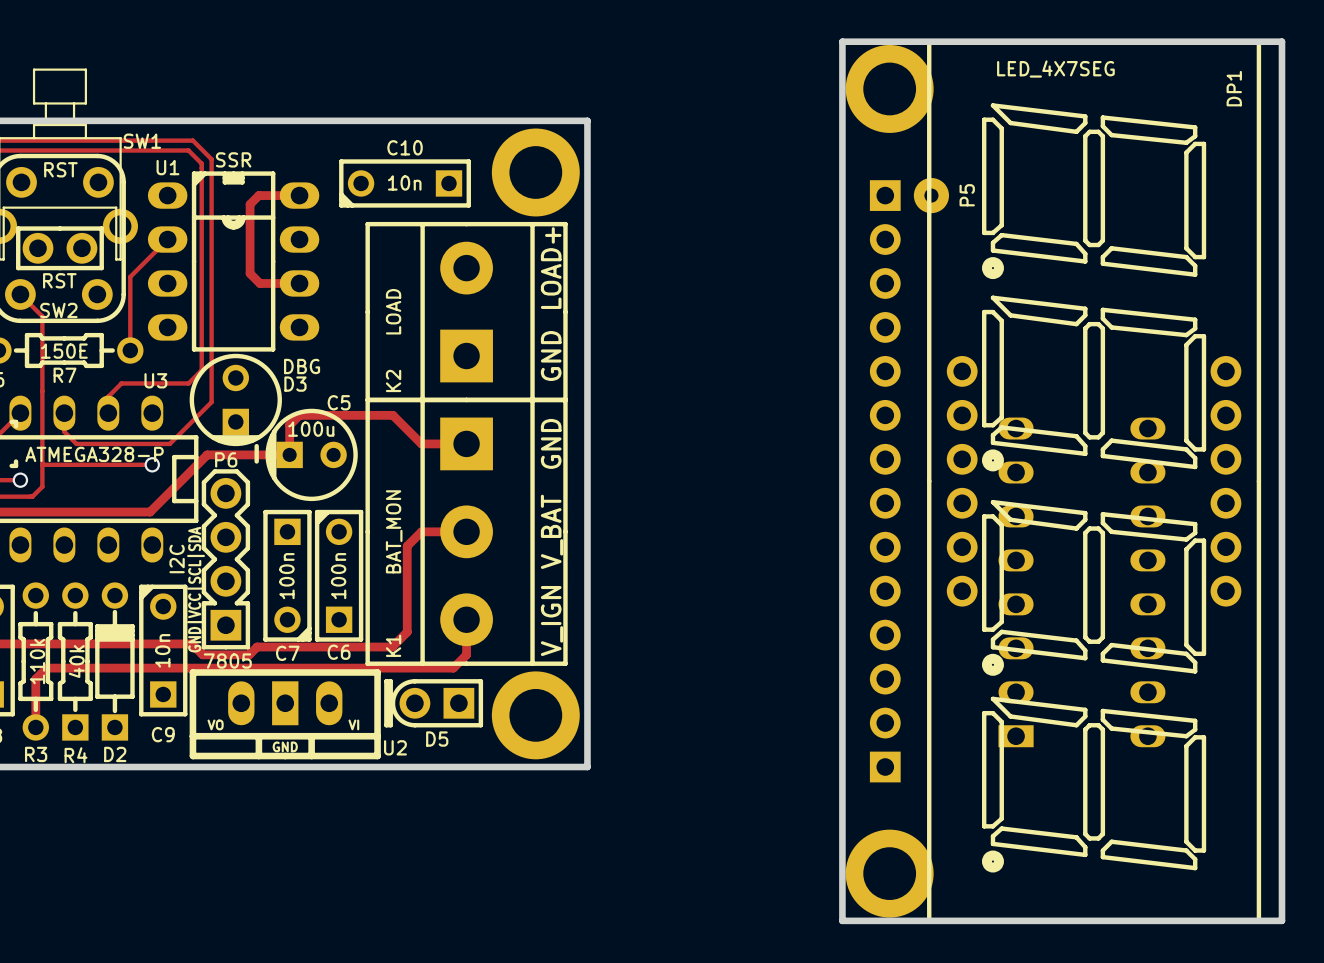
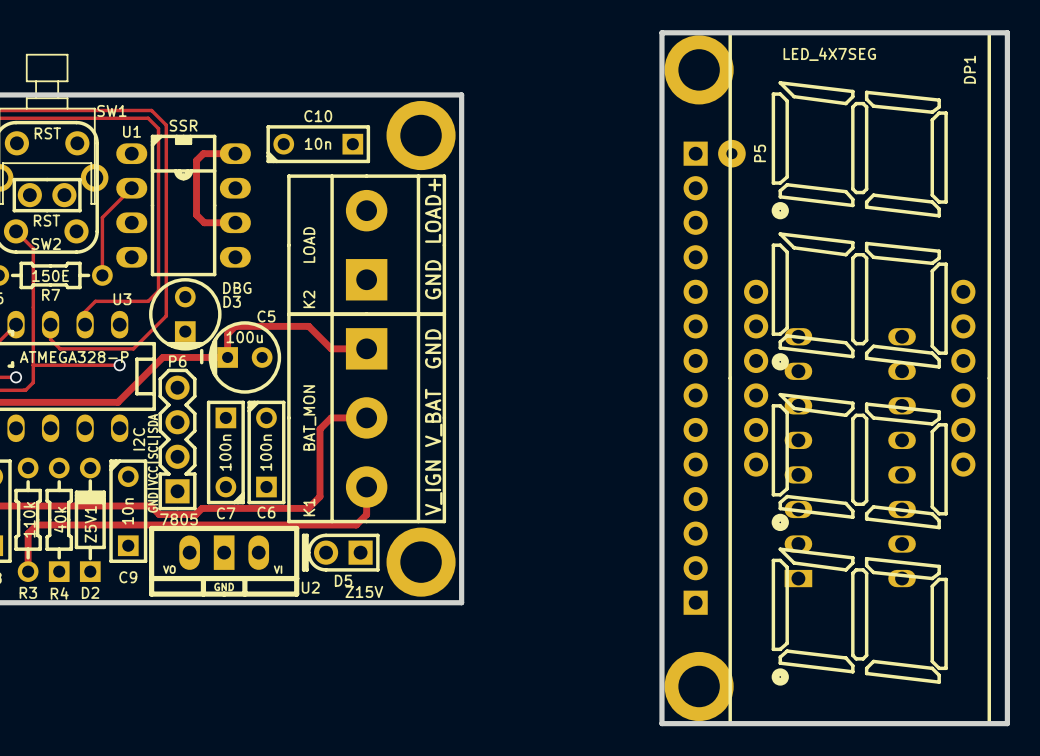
D2 value: none -> Z5V1 (90, 524)
D5 value: none -> Z15V (364, 591)

